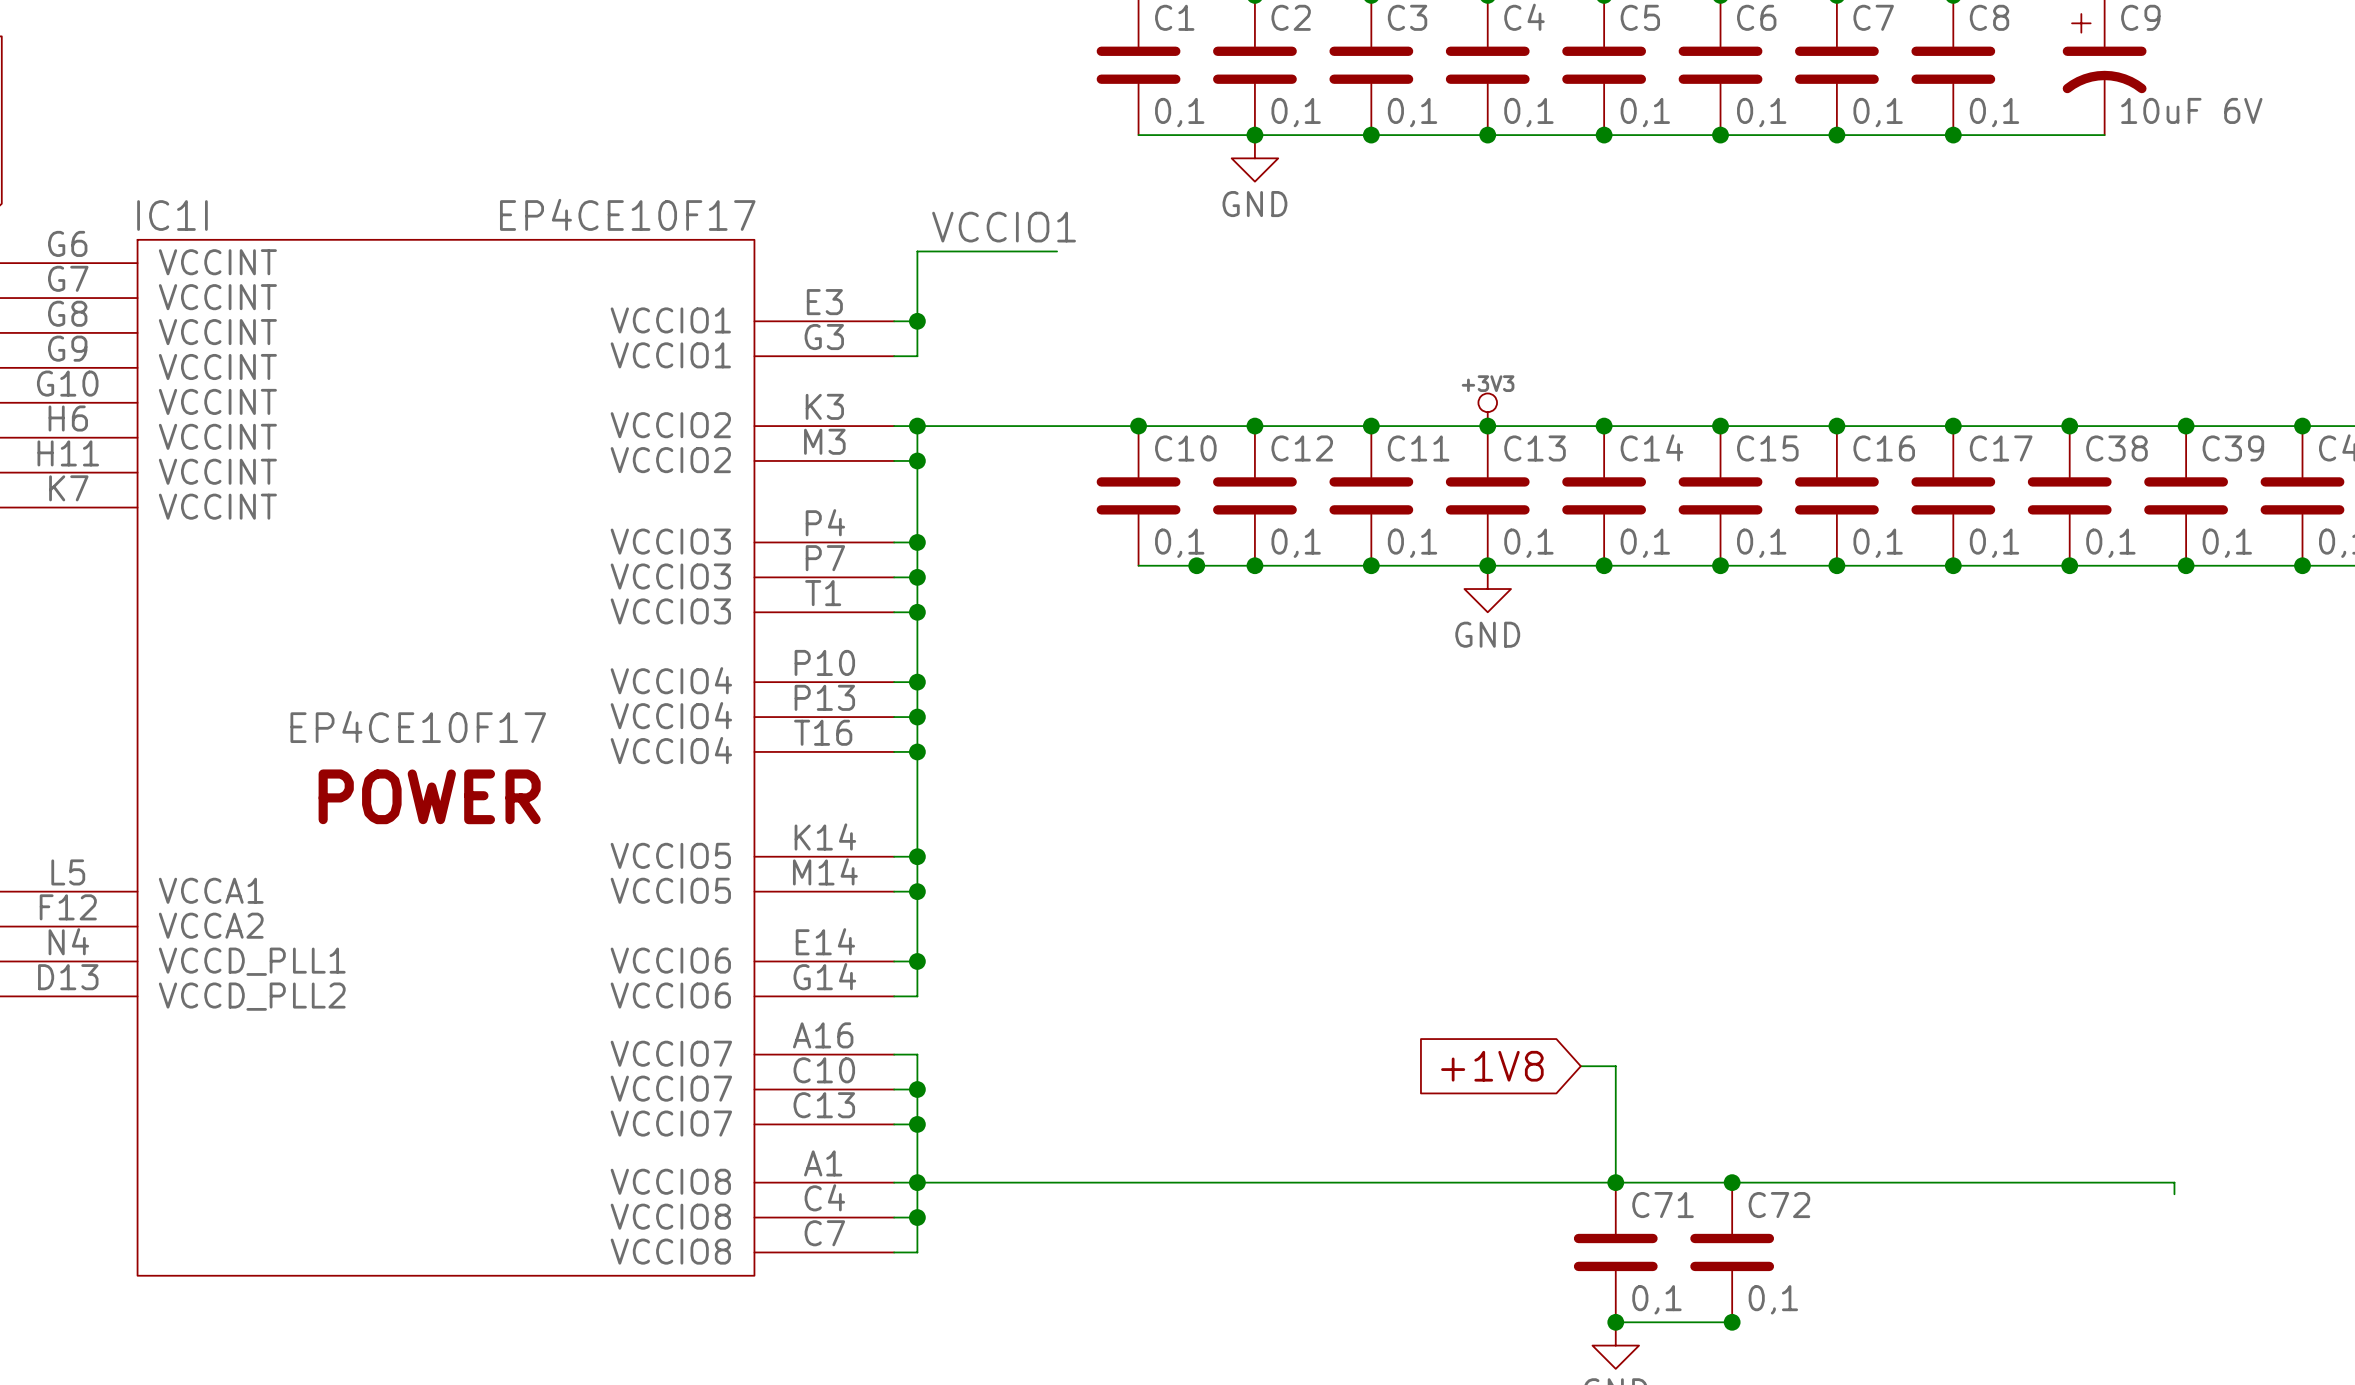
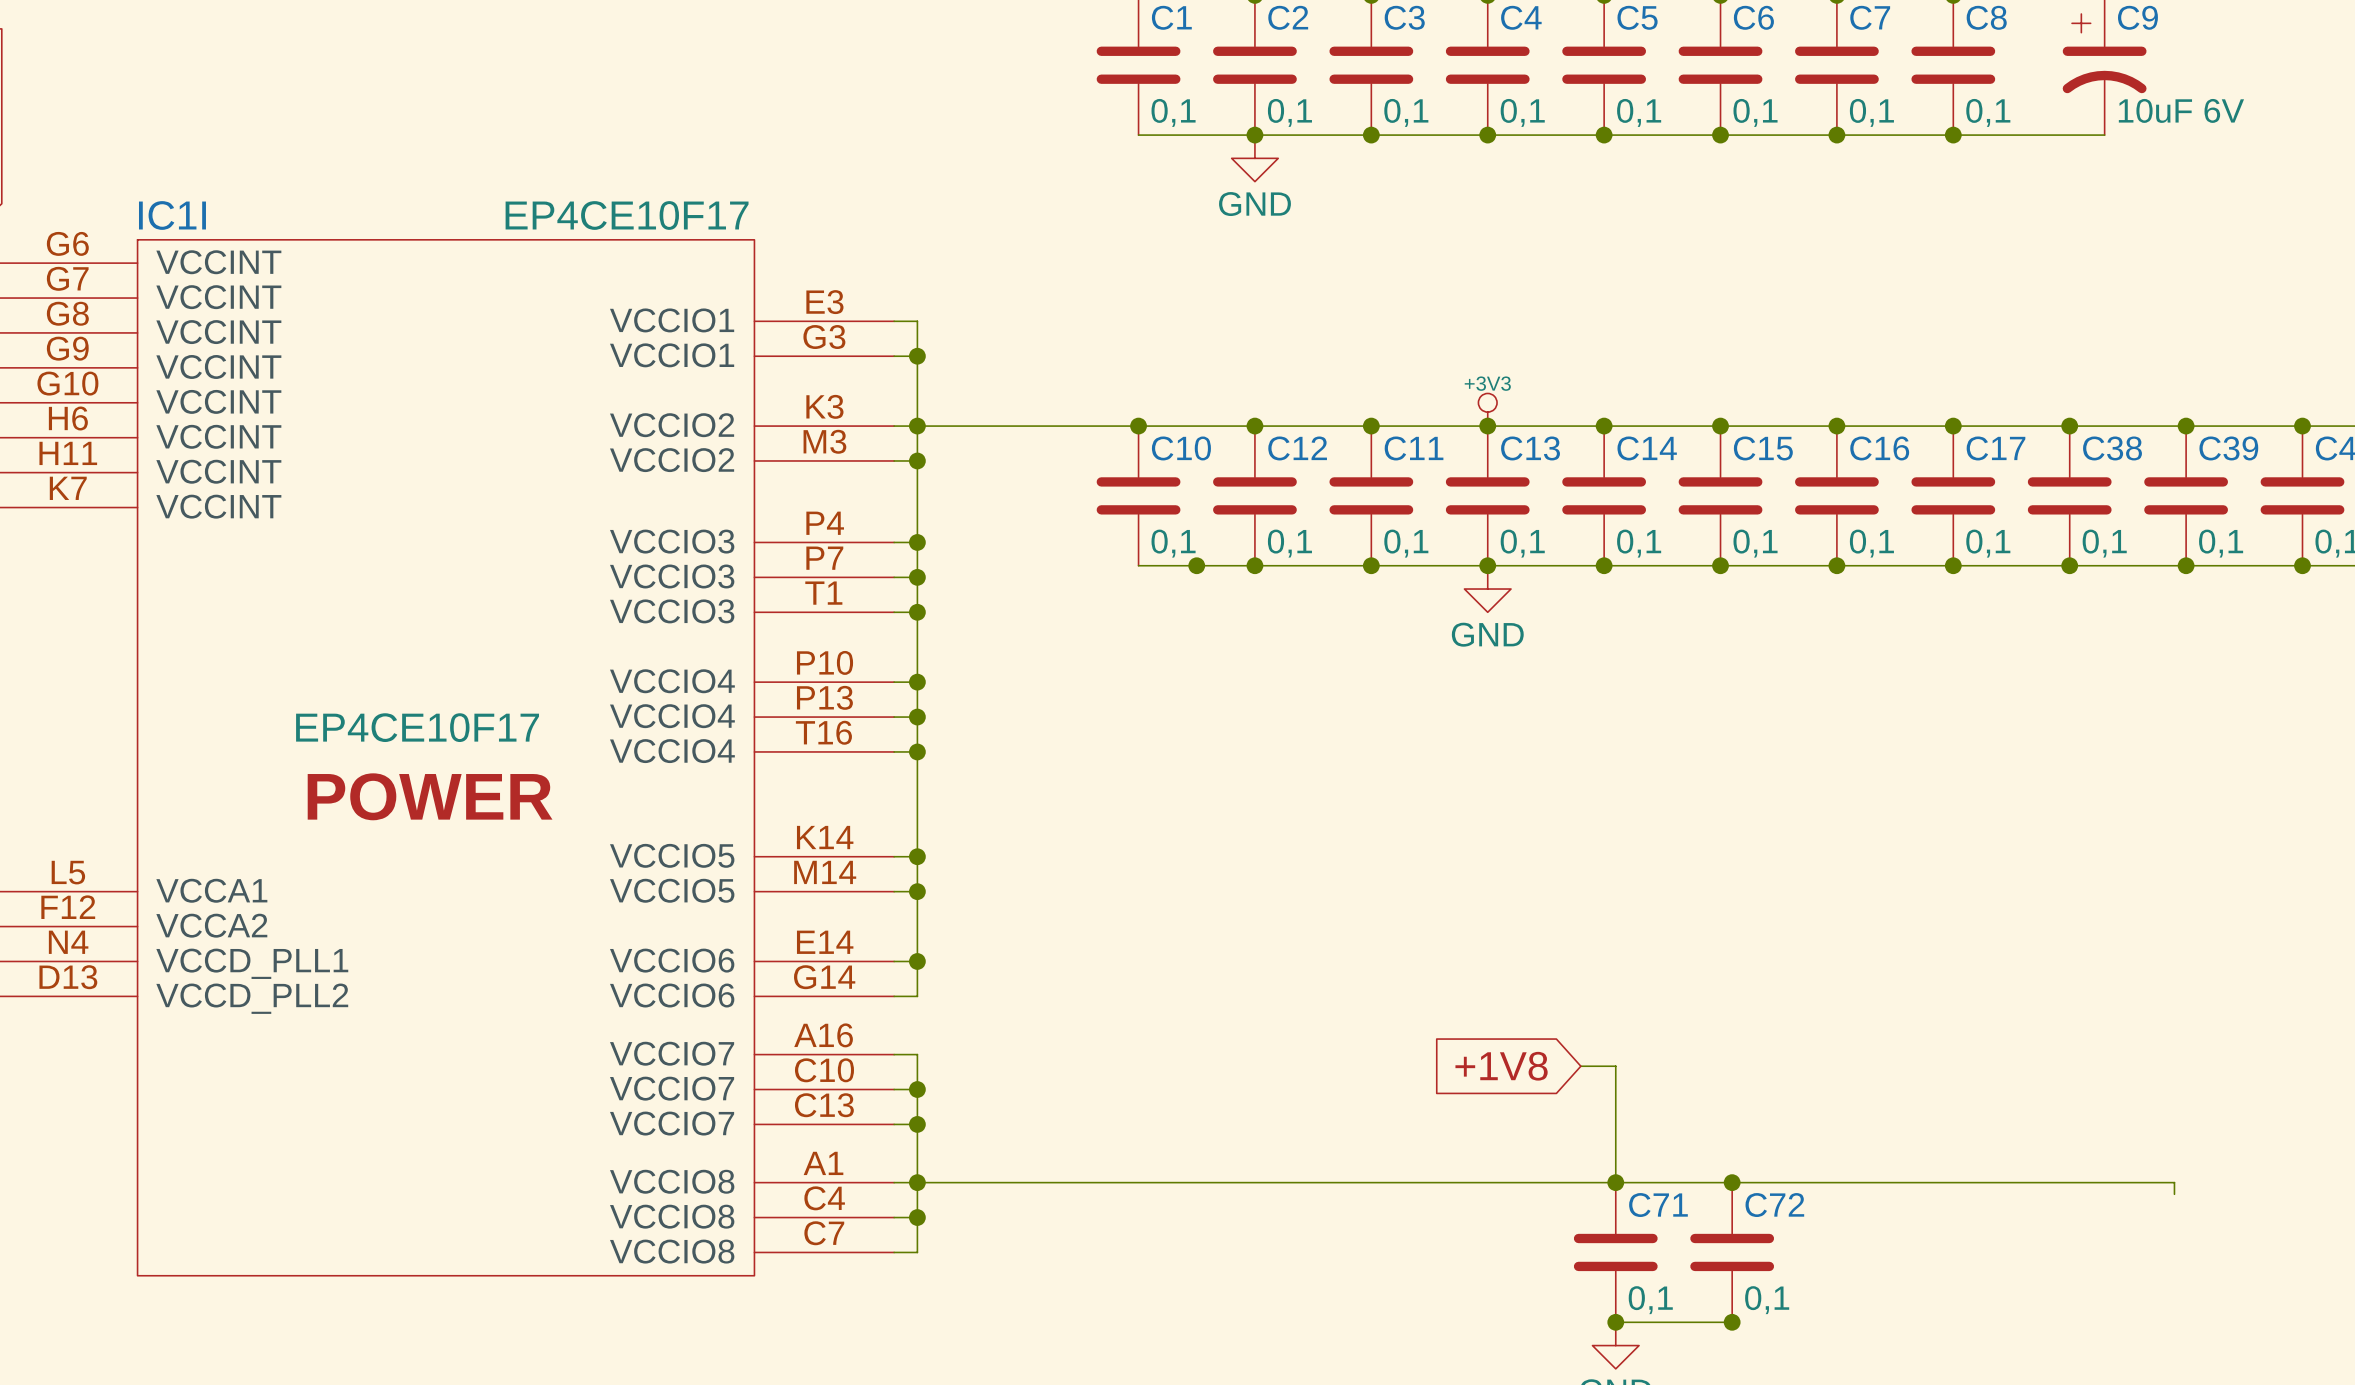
label: VCCIO1 (1004, 227) -> none
wire: (1057, 251) (917, 251) (917, 321) -> none
junction position: (917, 321) -> (917, 356)
wire: none -> (917, 356) (917, 426)

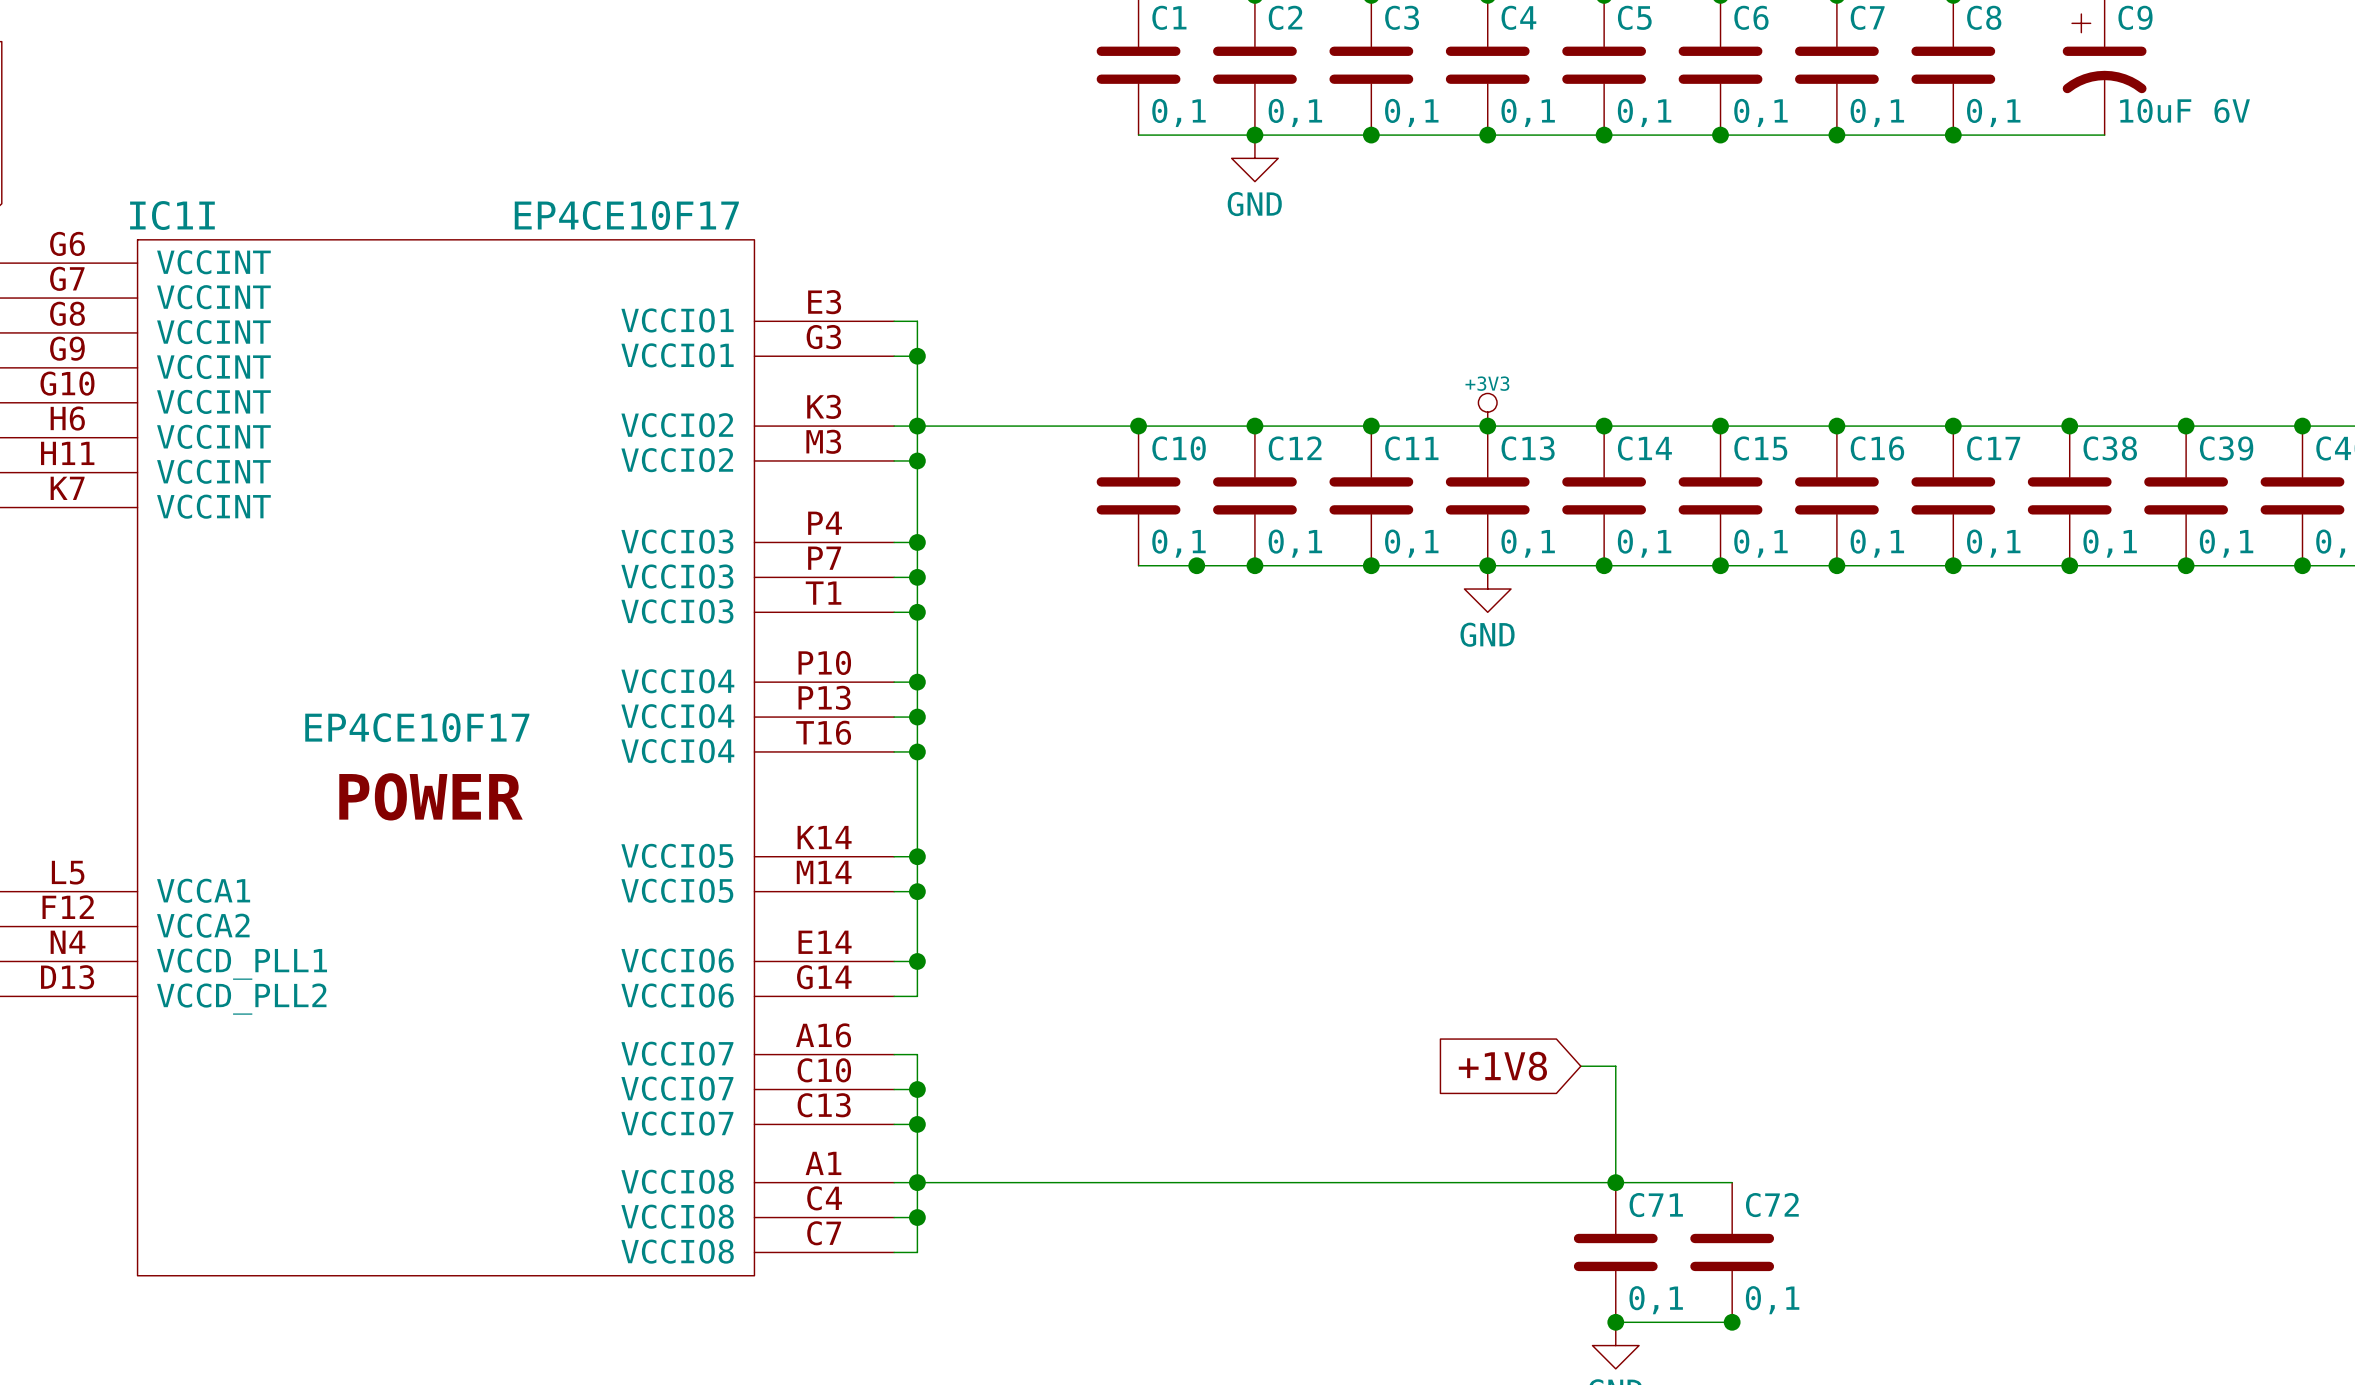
wire: (1732, 1182) (2174, 1182) (2174, 1194) -> none
junction: (1732, 1182) -> none

